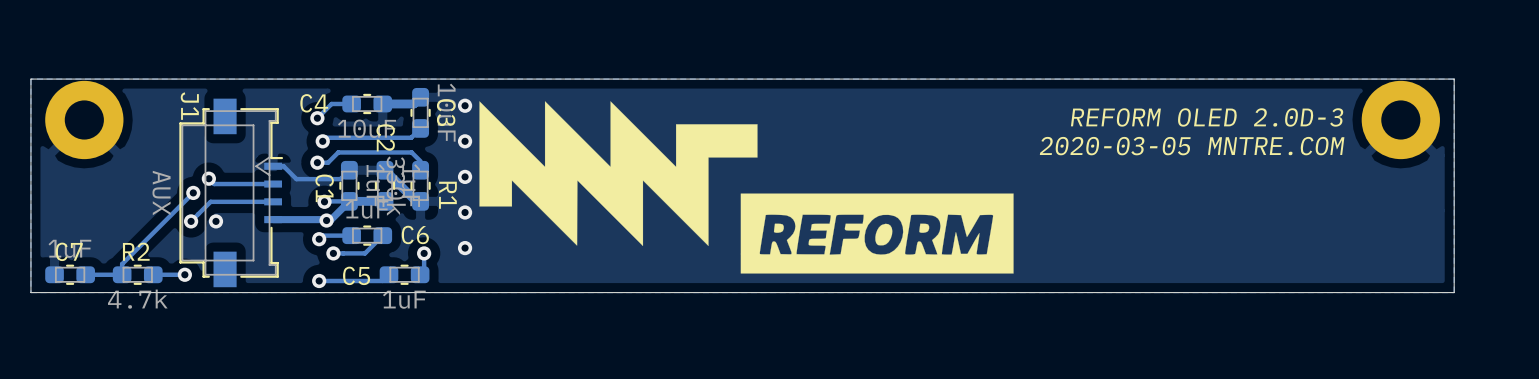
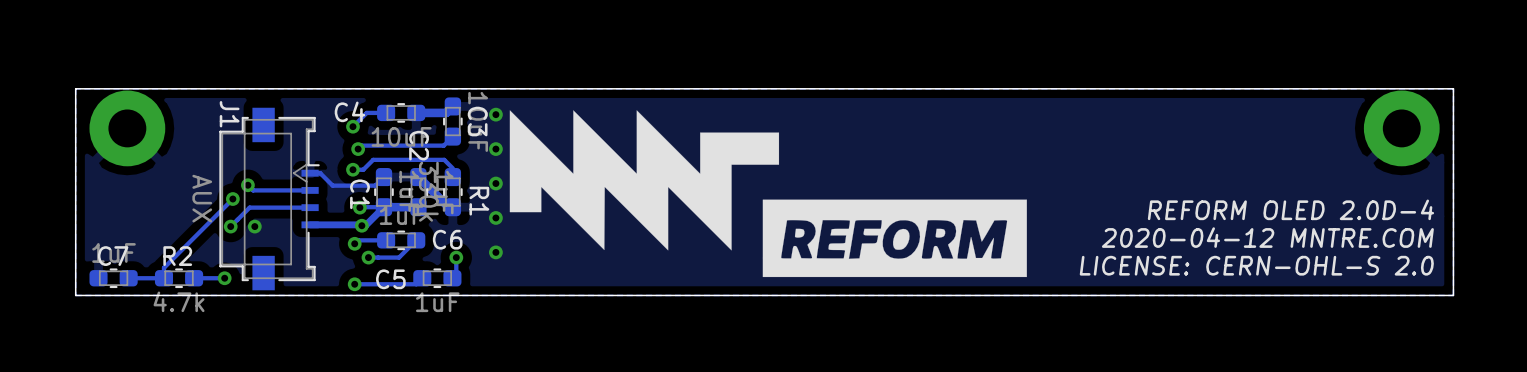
text: REFORM OLED 2.0D-3 (1207, 117) -> none
text: 2020-03-05 MNTRE.COM (1192, 146) -> none
text: none -> REFORM OLED 2.0D-4 (1290, 209)
text: none -> 2020-04-12 MNTRE.COM (1267, 237)
text: none -> LICENSE: CERN-OHL-S 2.0 (1256, 265)

